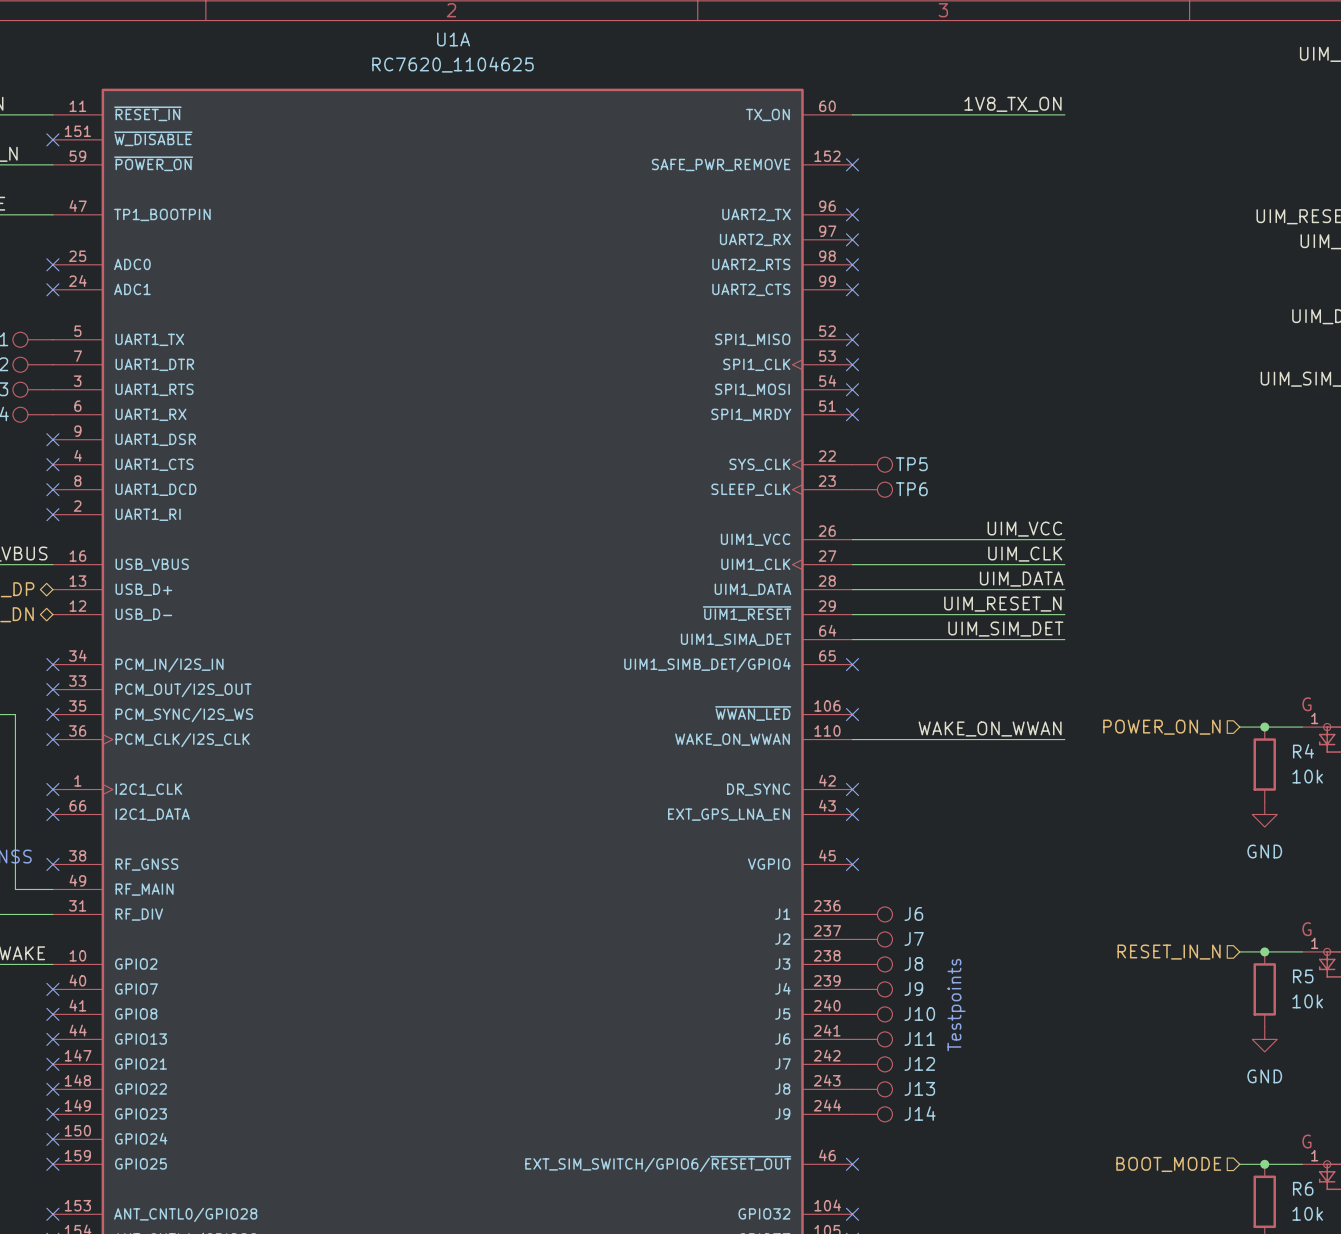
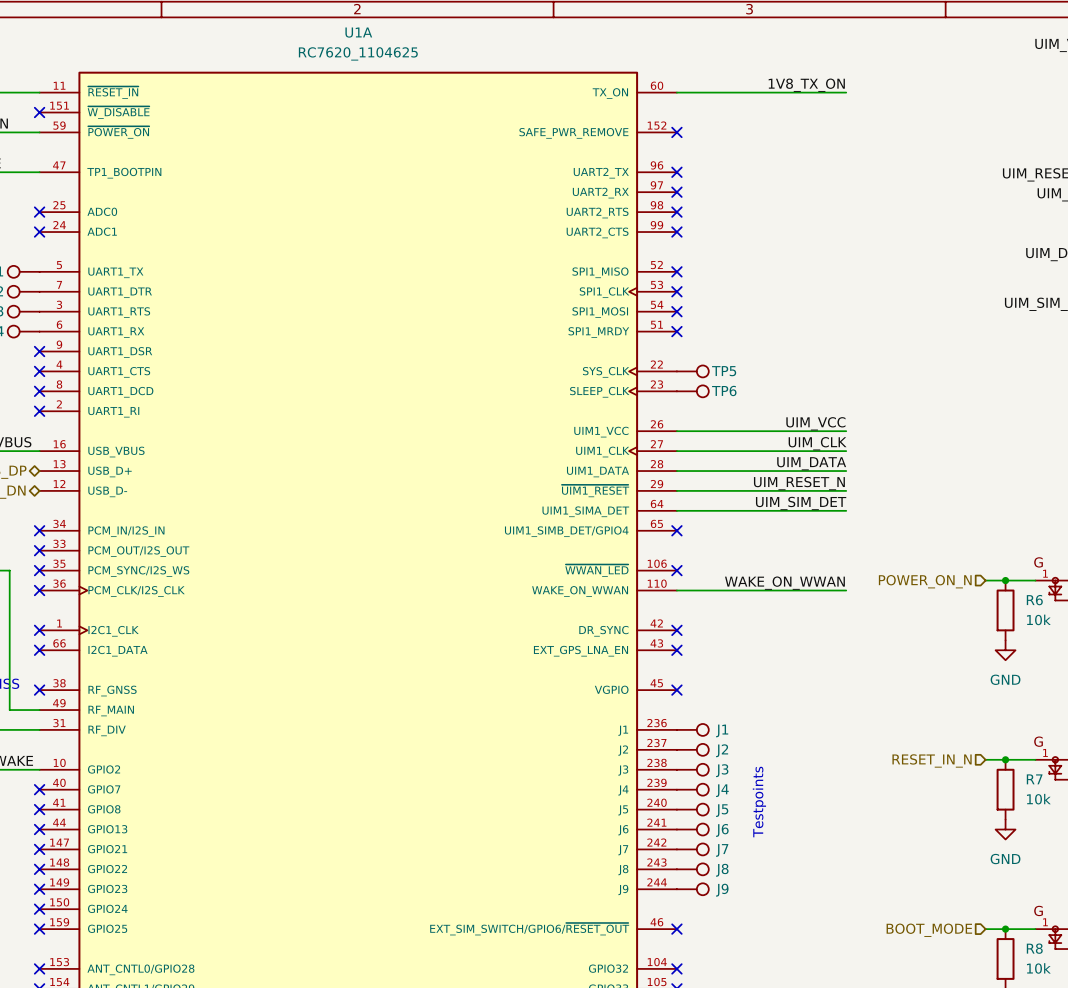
R4 name: R4 (1303, 751) -> R6 (1034, 600)
J6 name: J6 (913, 913) -> J1 (722, 730)
J7 name: J7 (914, 938) -> J2 (722, 750)
J8 name: J8 (913, 963) -> J3 (722, 770)
R5 name: R5 (1303, 976) -> R7 (1034, 779)
J9 name: J9 (913, 988) -> J4 (722, 790)
J10 name: J10 (919, 1013) -> J5 (722, 810)
J11 name: J11 (919, 1038) -> J6 (722, 830)
J12 name: J12 (919, 1063) -> J7 (722, 850)
J13 name: J13 (919, 1088) -> J8 (722, 870)
J14 name: J14 (920, 1113) -> J9 (722, 890)
R6 name: R6 (1303, 1188) -> R8 (1034, 948)

